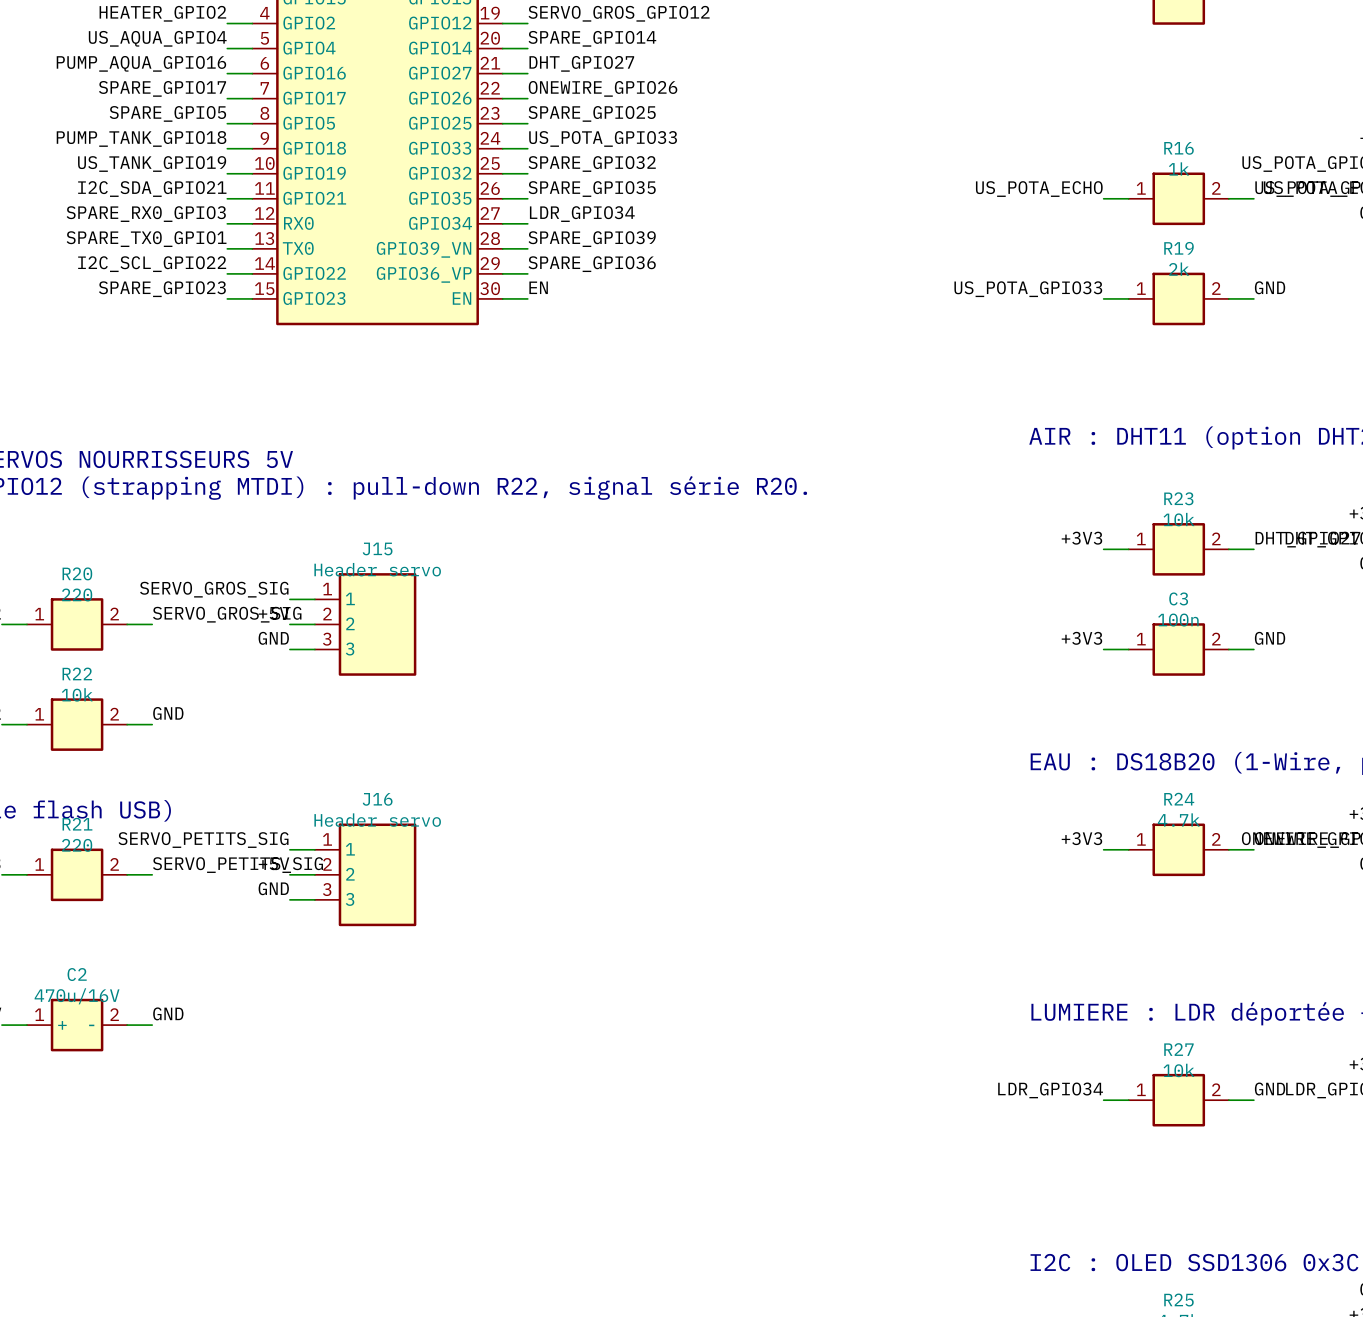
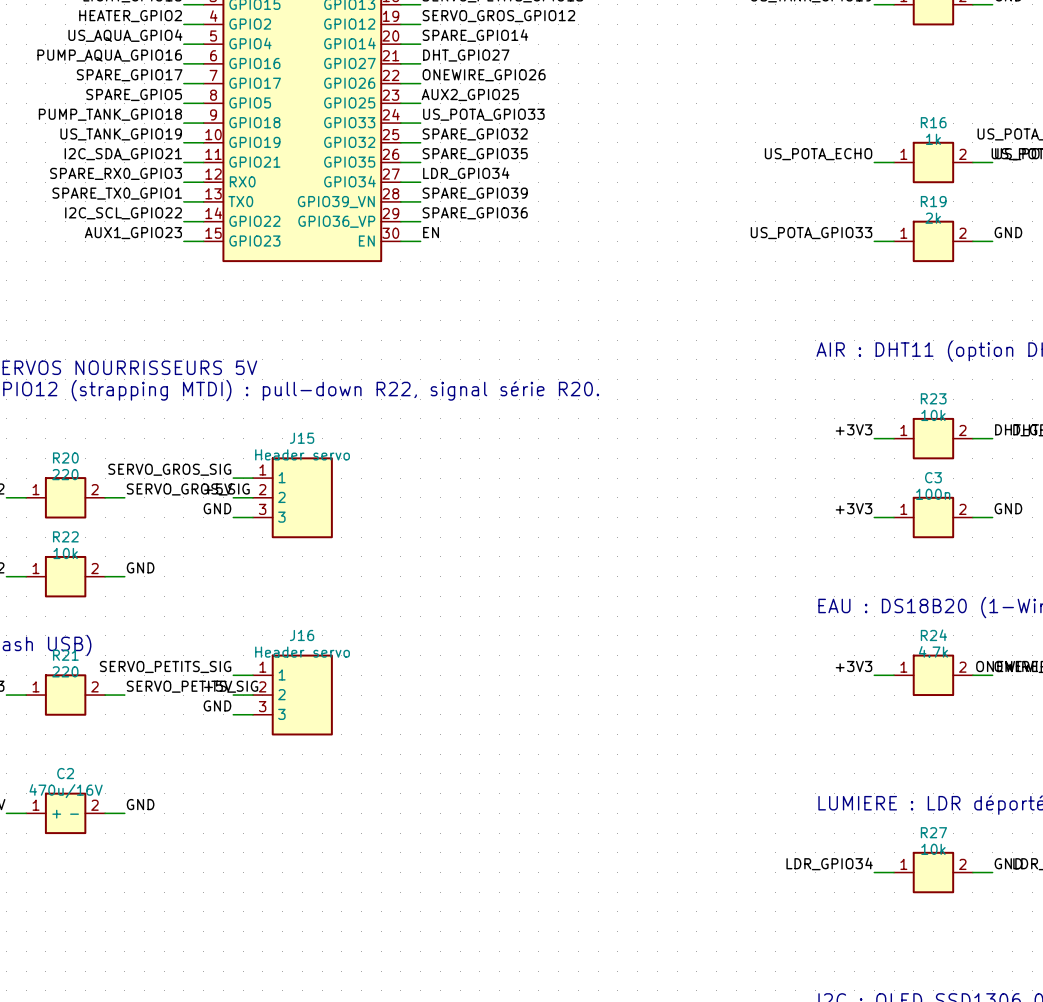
label: SPARE_GPIO25 (592, 113) -> AUX2_GPIO25 (470, 94)
label: SPARE_GPIO23 (162, 289) -> AUX1_GPIO23 (133, 233)

